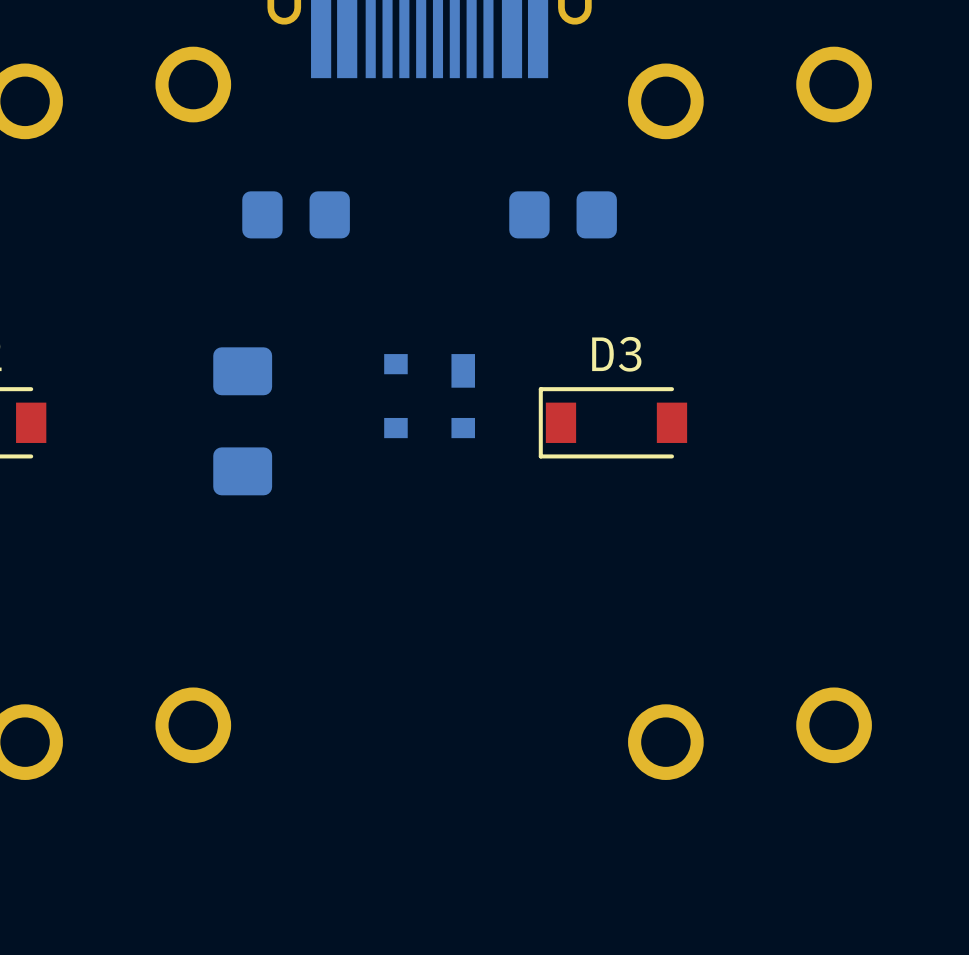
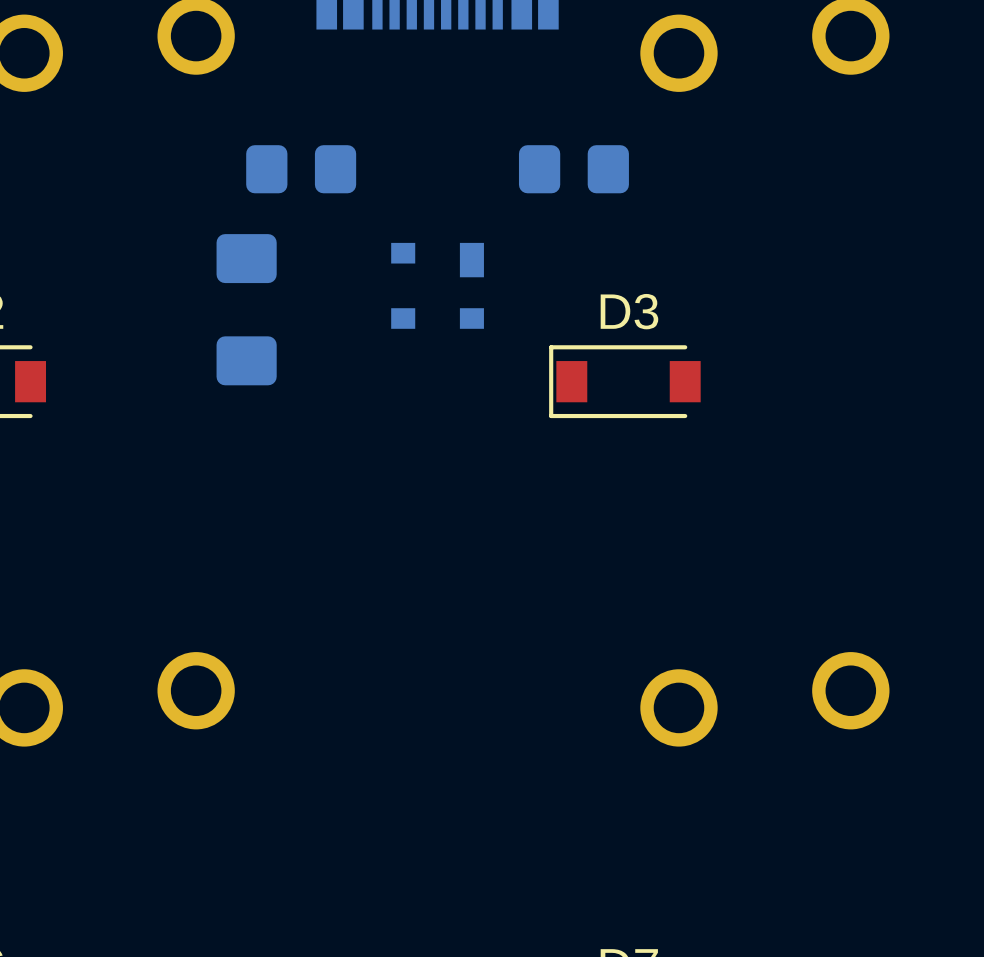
part position: (429, 396) -> (437, 285)
part position: (242, 421) -> (246, 309)

